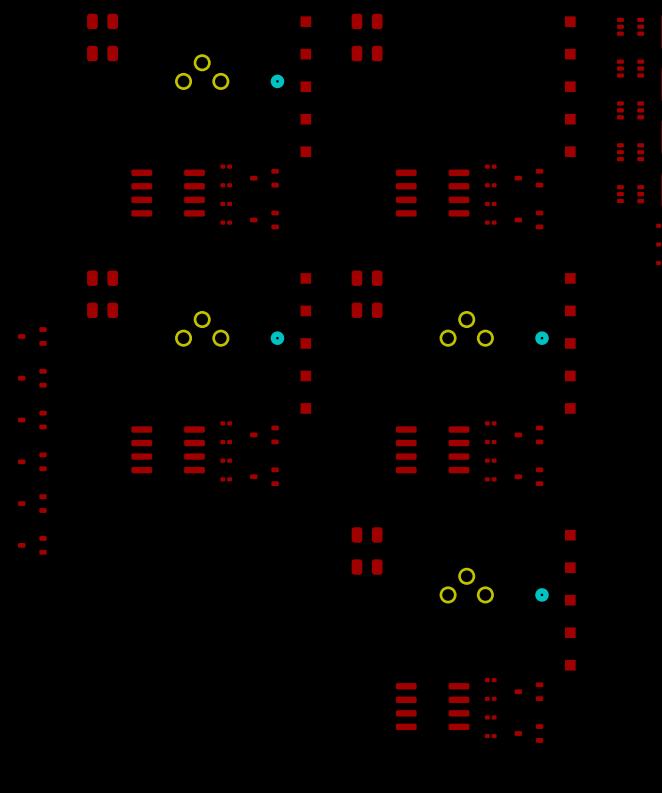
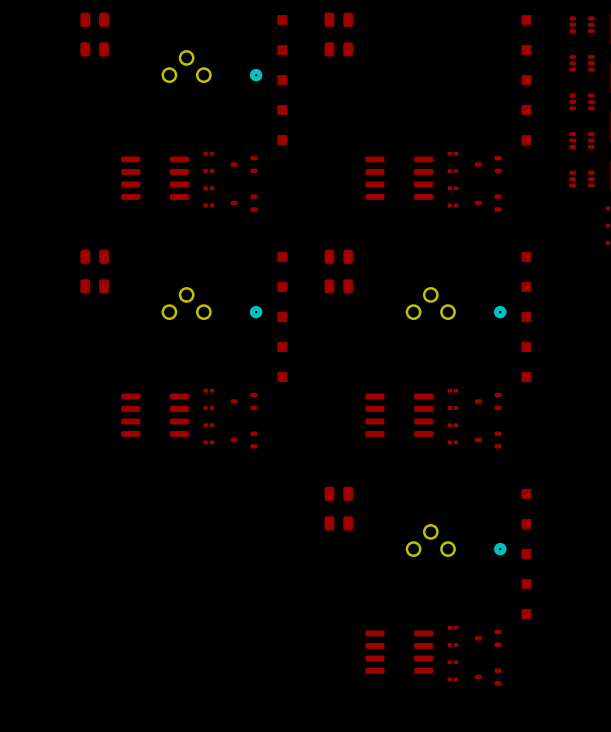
part: (32, 336) -> none
part: (32, 378) -> none
part: (32, 420) -> none
part: (32, 461) -> none
part: (32, 503) -> none
part: (32, 545) -> none

